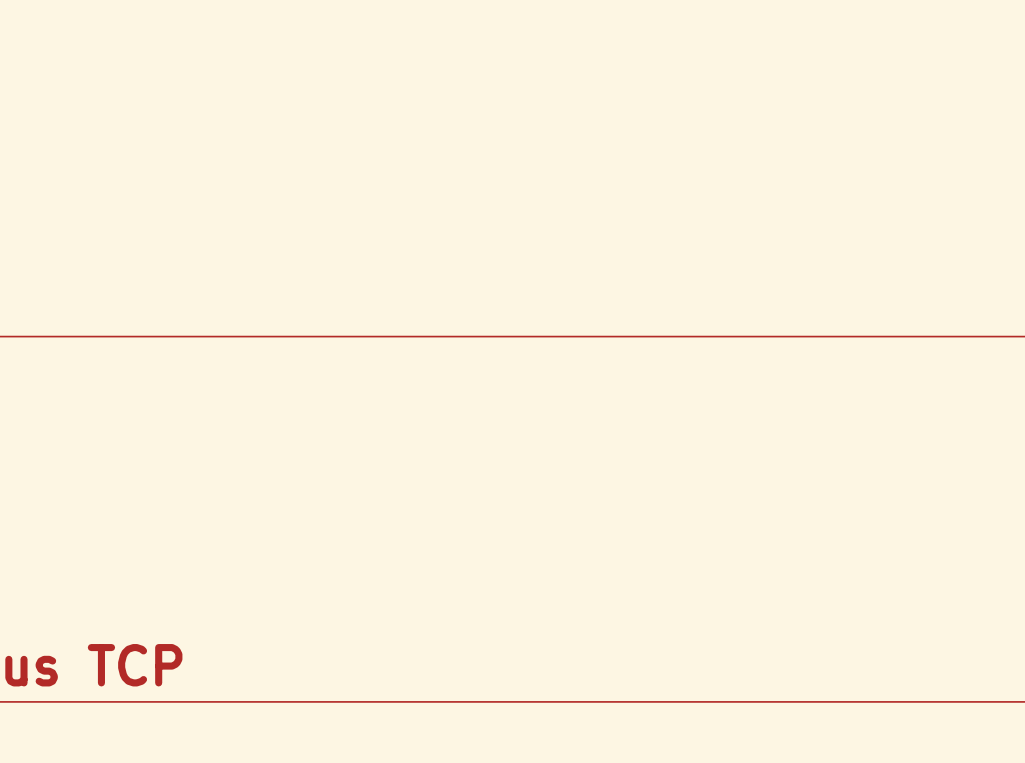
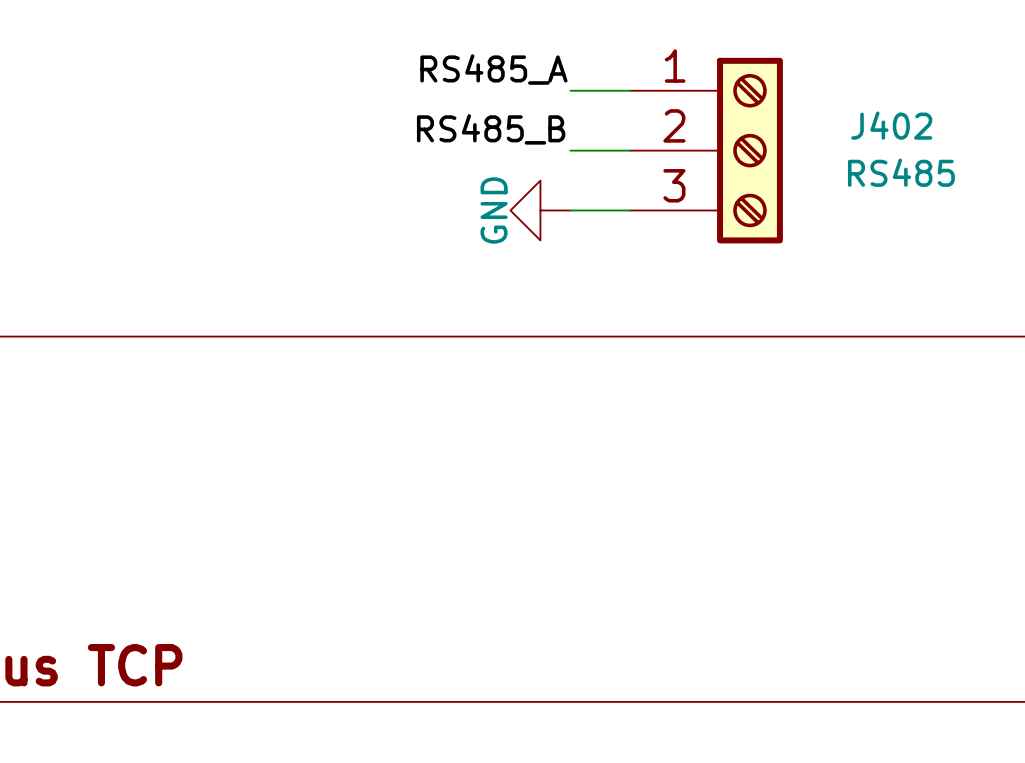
label: none -> RS485_A (493, 69)
wire: none -> (570, 90) (630, 90)
label: none -> RS485_B (491, 129)
wire: none -> (570, 150) (630, 150)
J402: none -> RS485 (706, 150)
power symbol: none -> GND (540, 210)
wire: none -> (570, 210) (630, 210)

